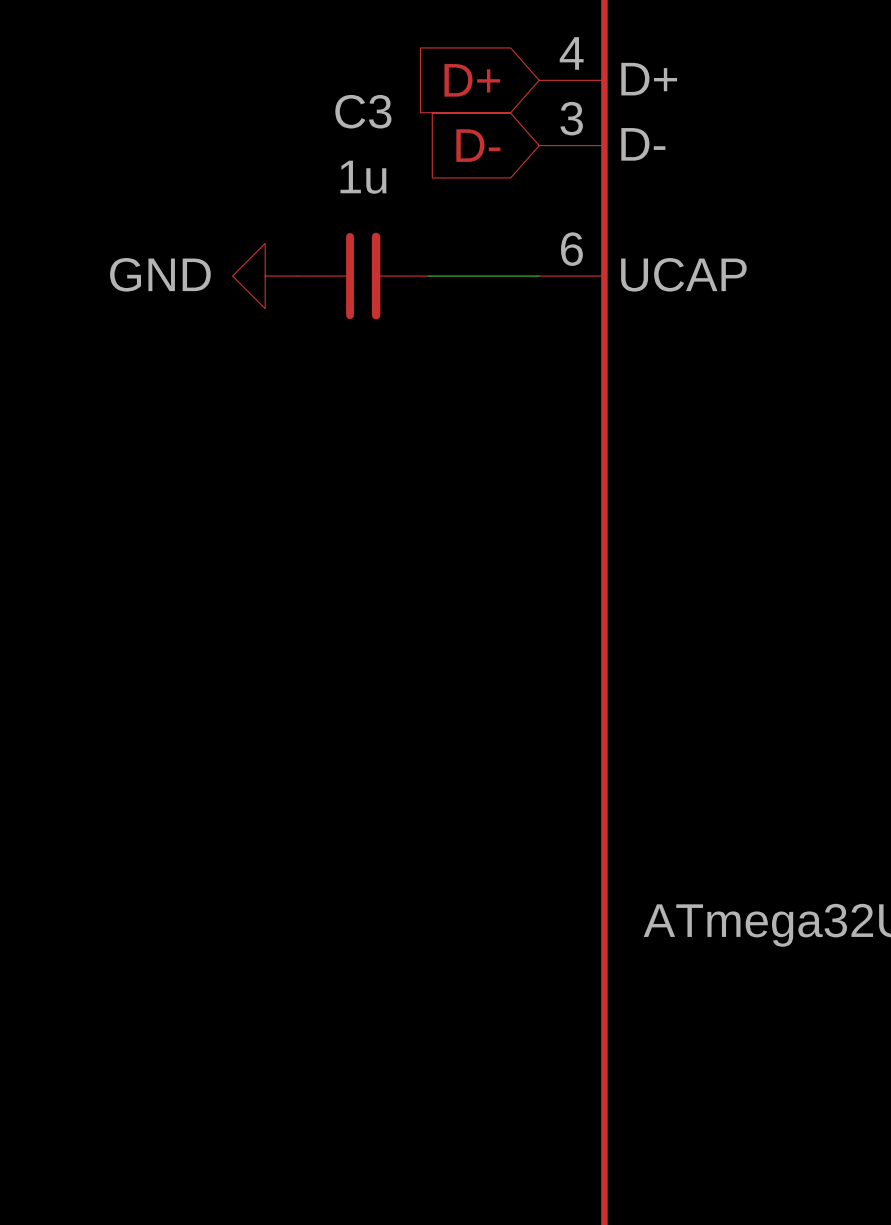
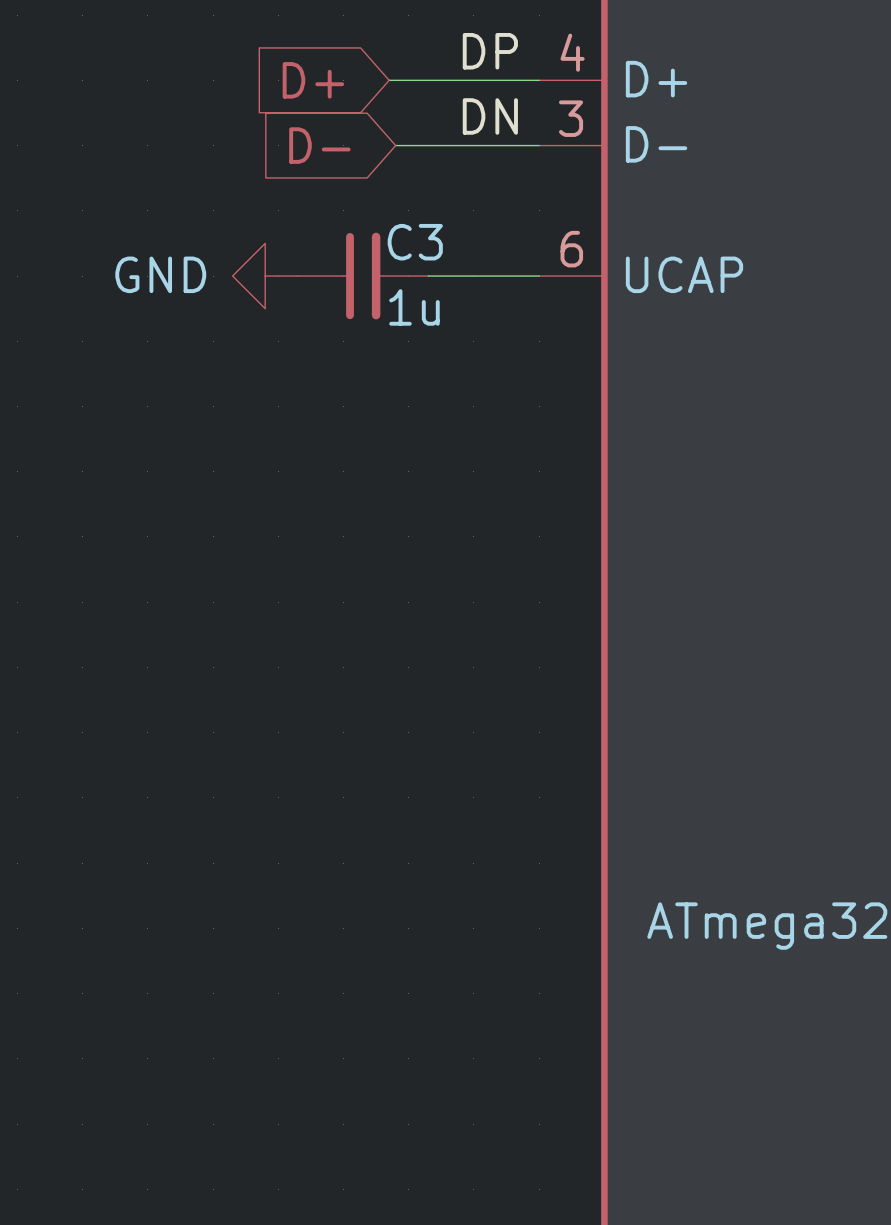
label: none -> DP (490, 51)
wire: none -> (389, 80) (539, 80)
global label position: D+ (472, 80) -> D+ (313, 80)
C3 name position: C3 (363, 111) -> C3 (415, 242)
label: none -> DN (490, 116)
wire: none -> (395, 145) (539, 145)
global label position: D- (478, 145) -> D- (319, 145)
C3 value position: 1u (363, 177) -> 1u (414, 307)

